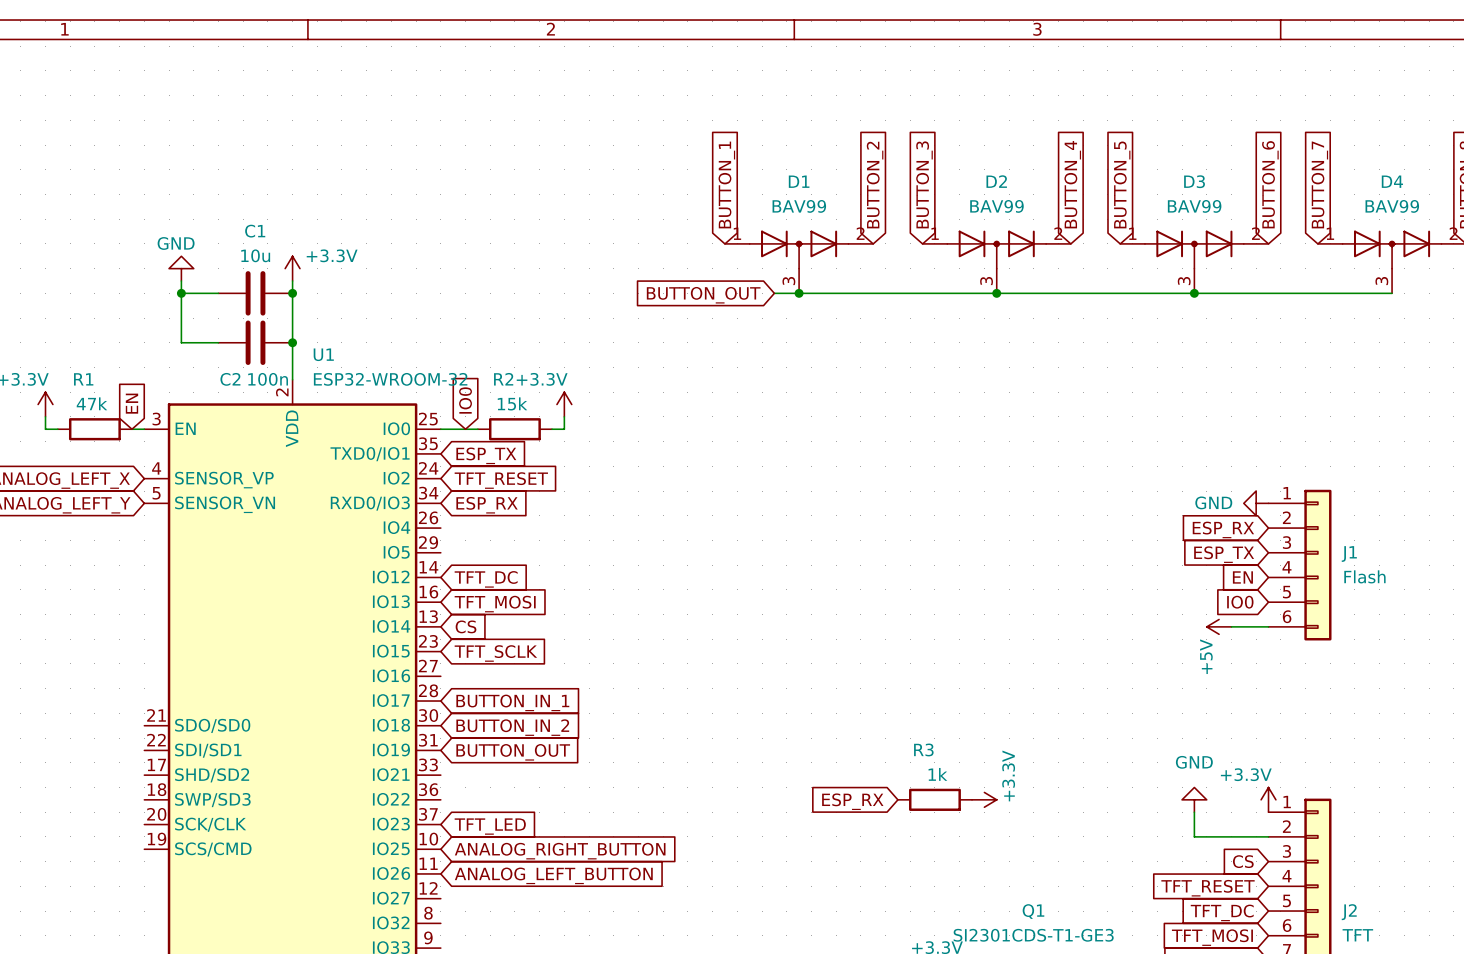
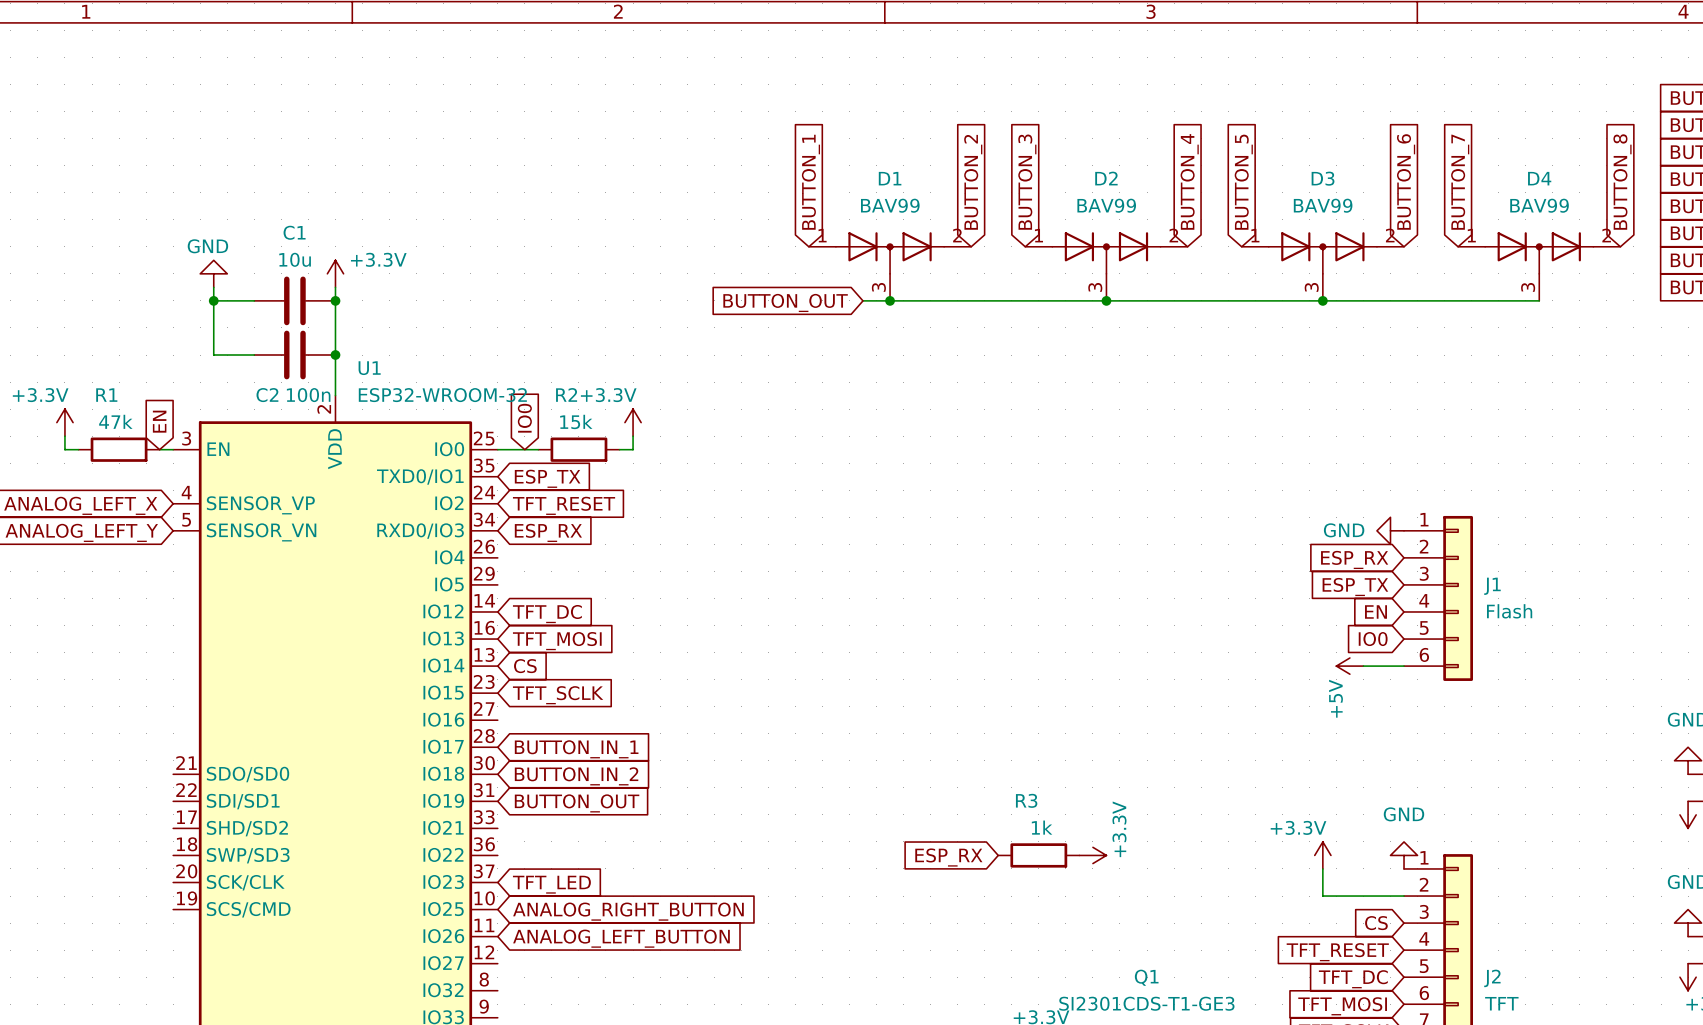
power symbol: GND (1194, 799) -> +3.3V (1322, 855)
power symbol: +3.3V (1268, 799) -> GND (1404, 855)

